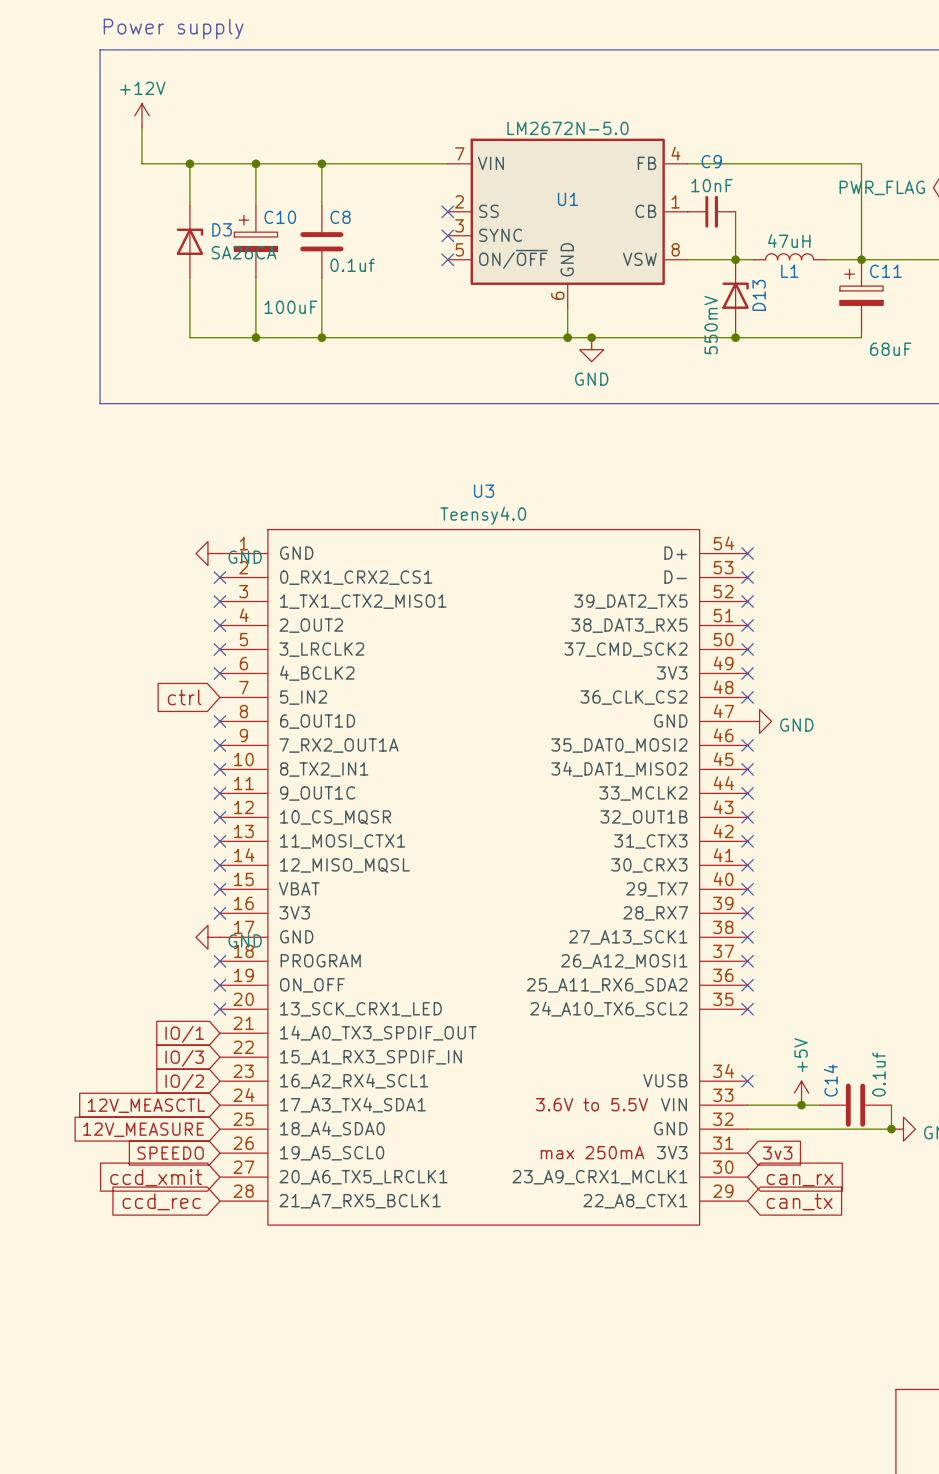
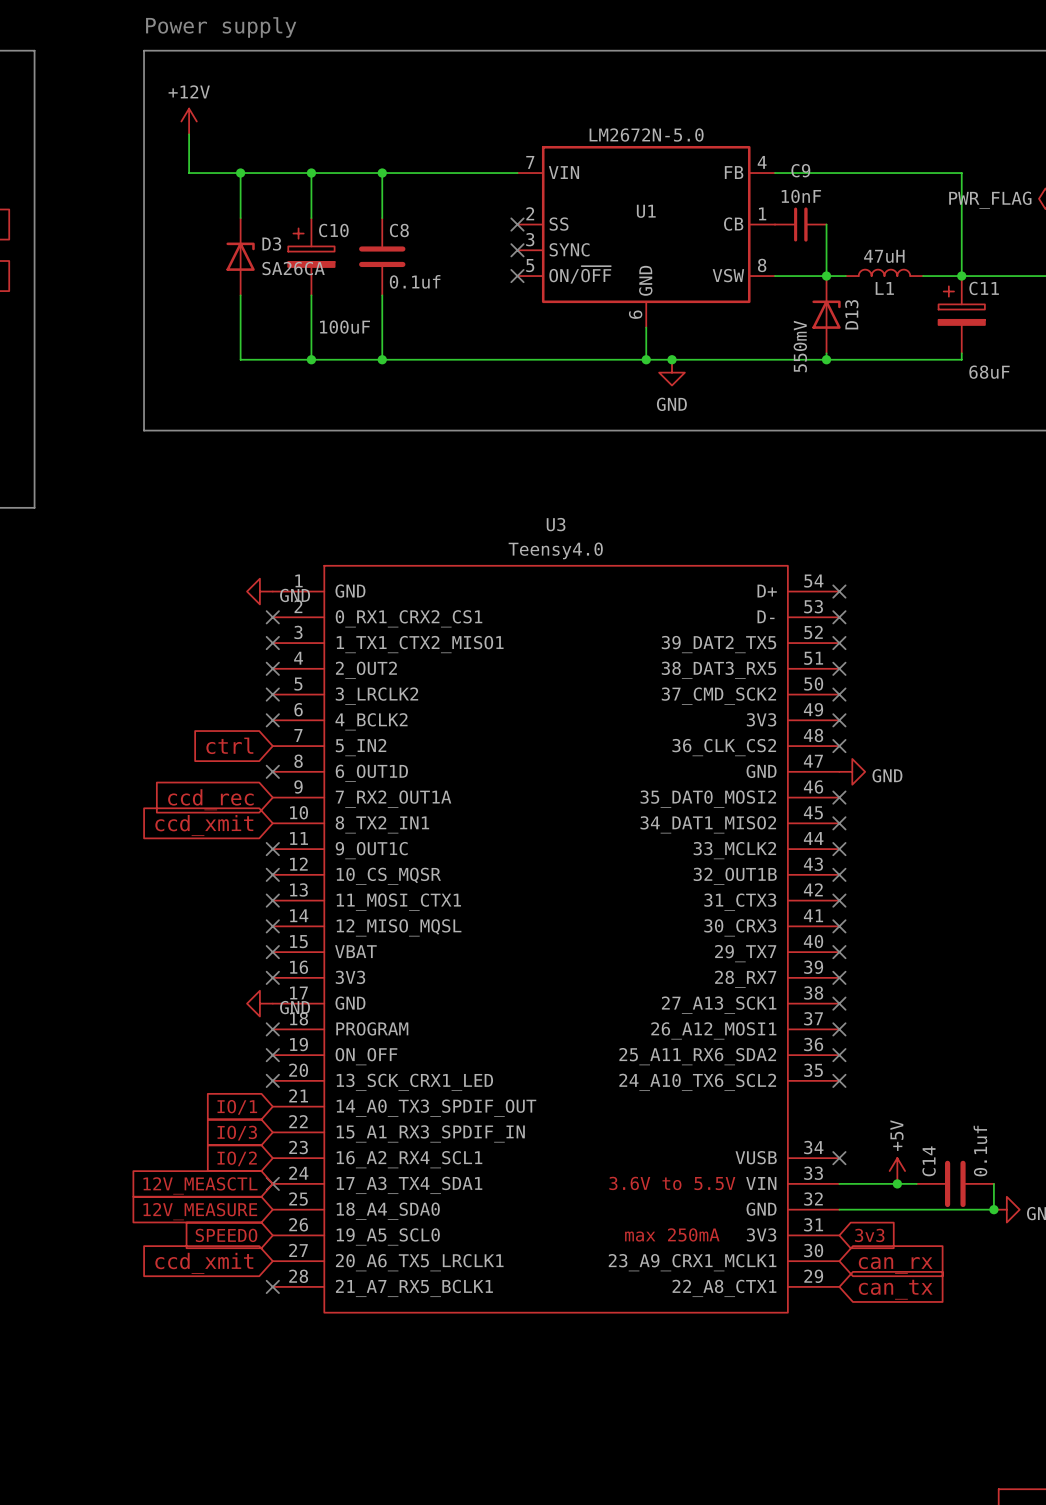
no-connect mark: (219, 745) -> none
global label: none -> ccd_rec (210, 799)
no-connect mark: (219, 769) -> none
global label: none -> ccd_xmit (204, 825)
no-connect mark: none -> (272, 1183)
global label: ccd_rec (161, 1201) -> none
no-connect mark: none -> (272, 1286)

